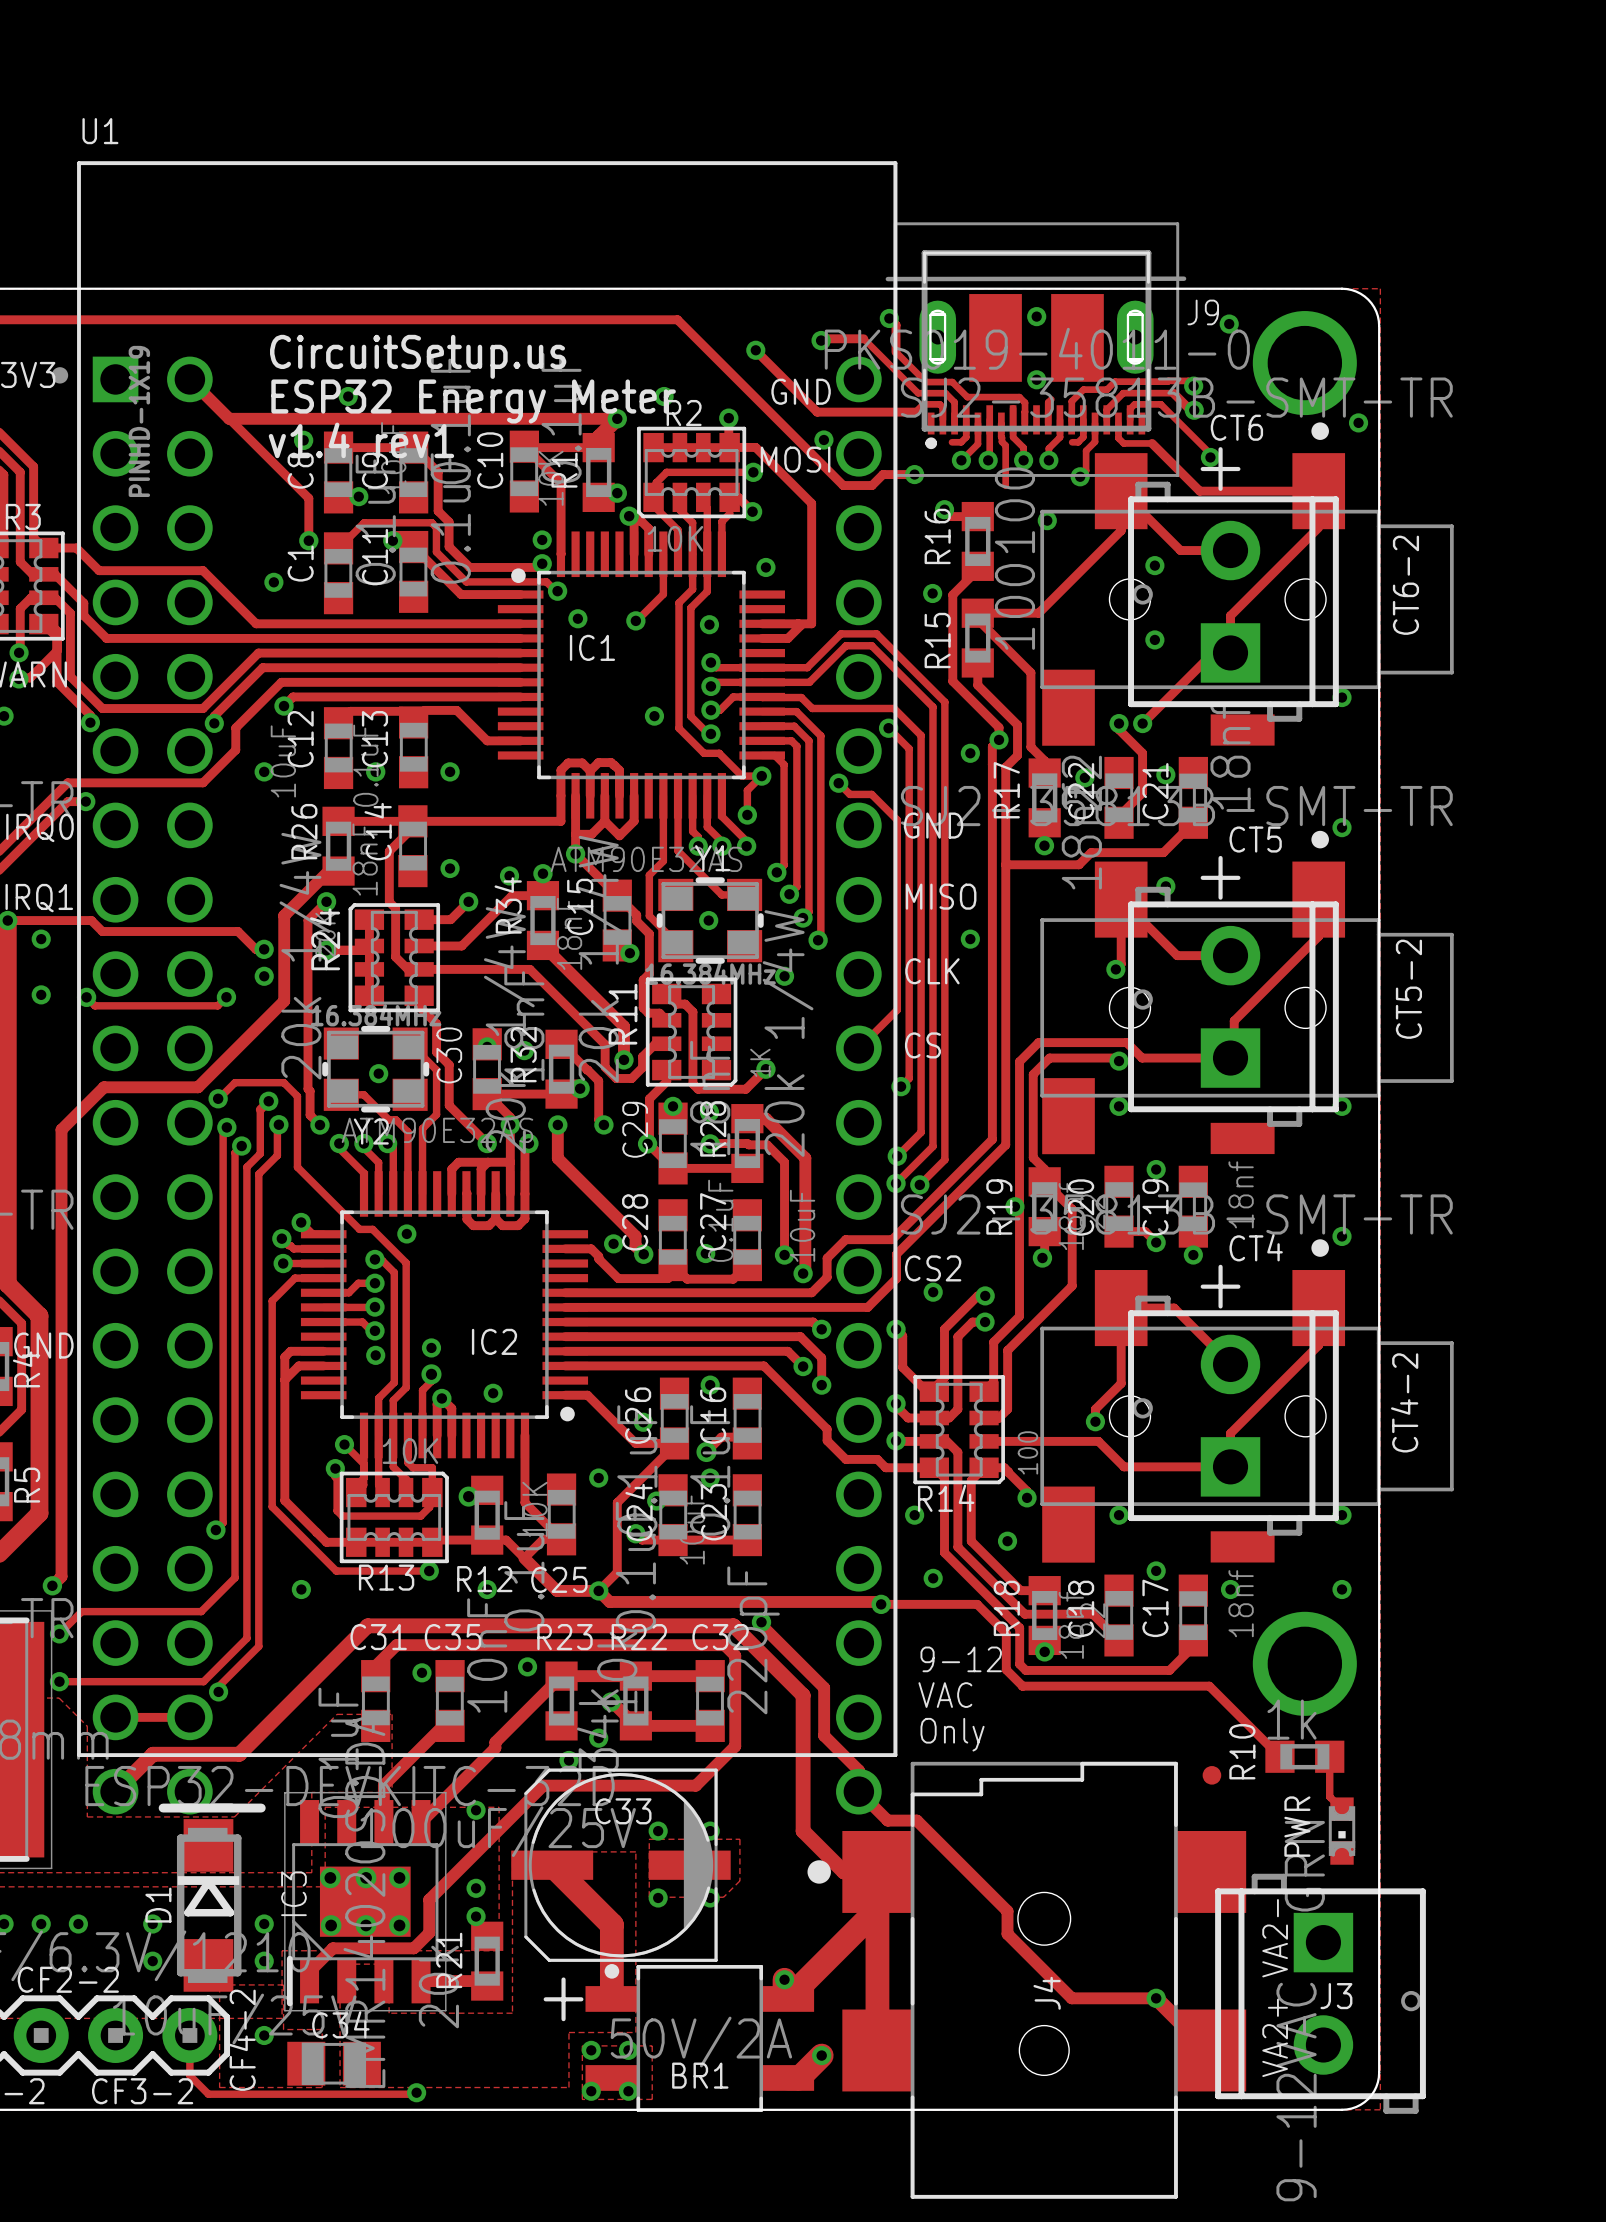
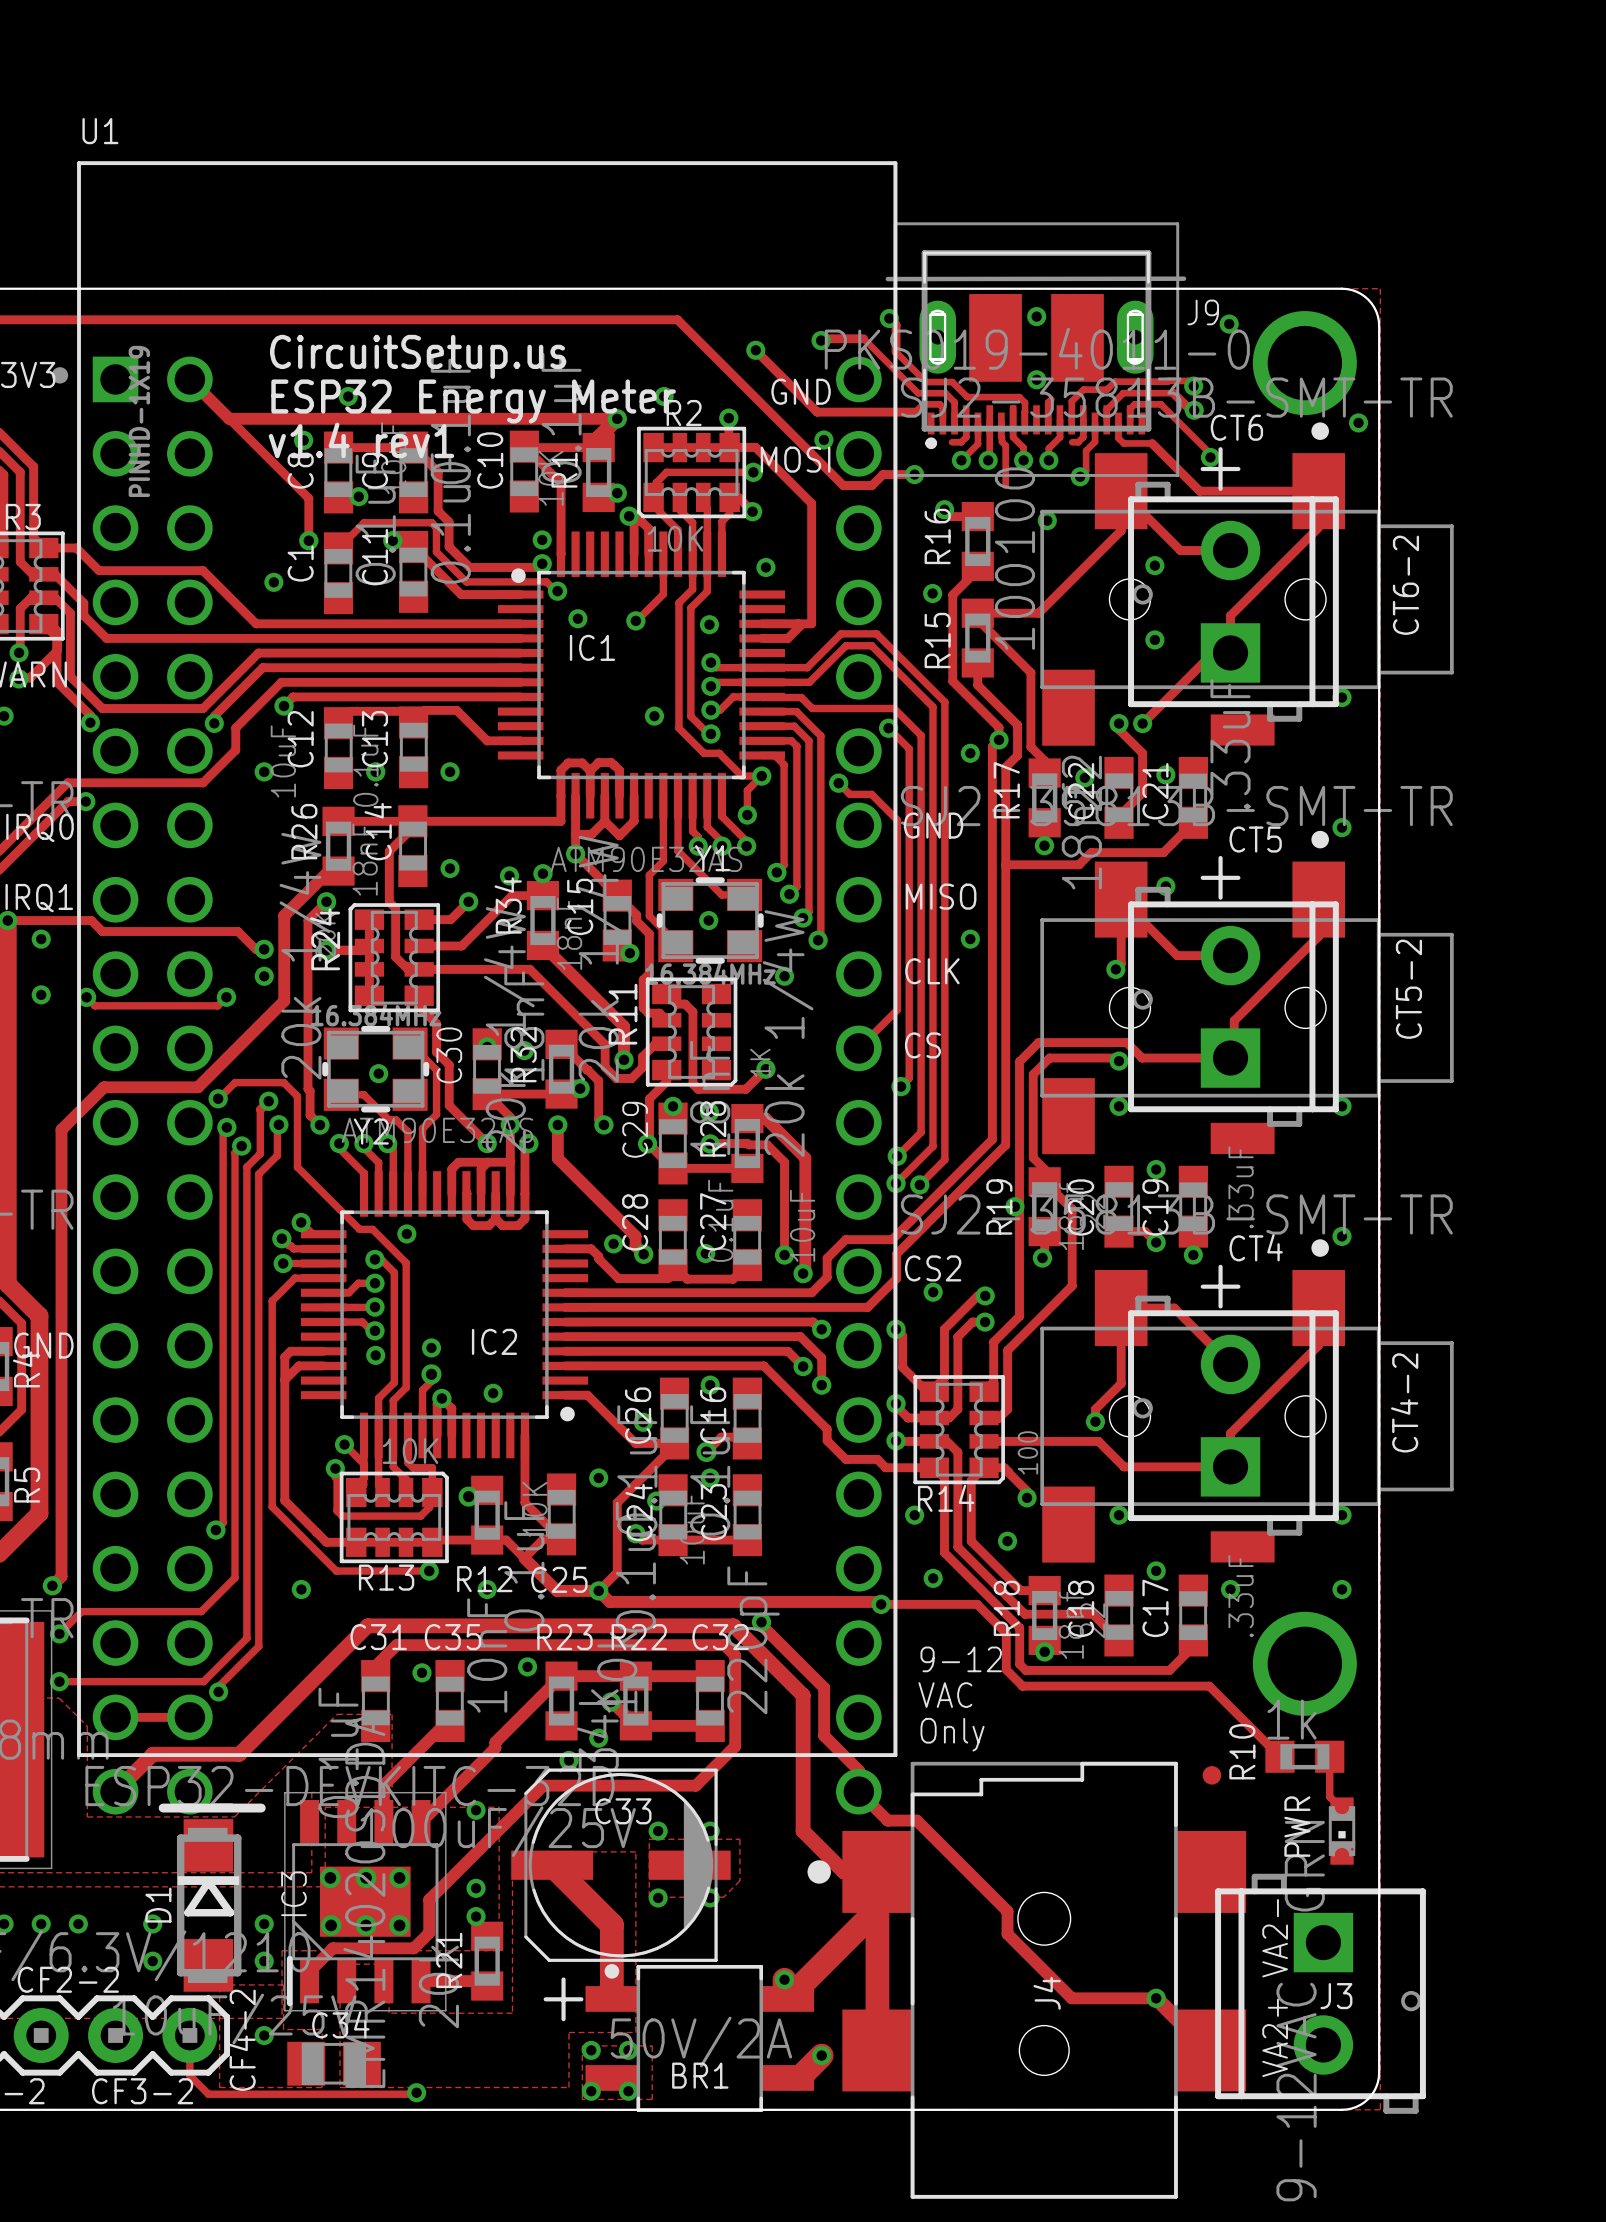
C21 value: 18nf (1230, 756) -> .33uF (1230, 744)
C19 value: 18nf (1241, 1194) -> .33uF (1241, 1187)
C17 value: 18nf (1241, 1603) -> .33uF (1241, 1596)

